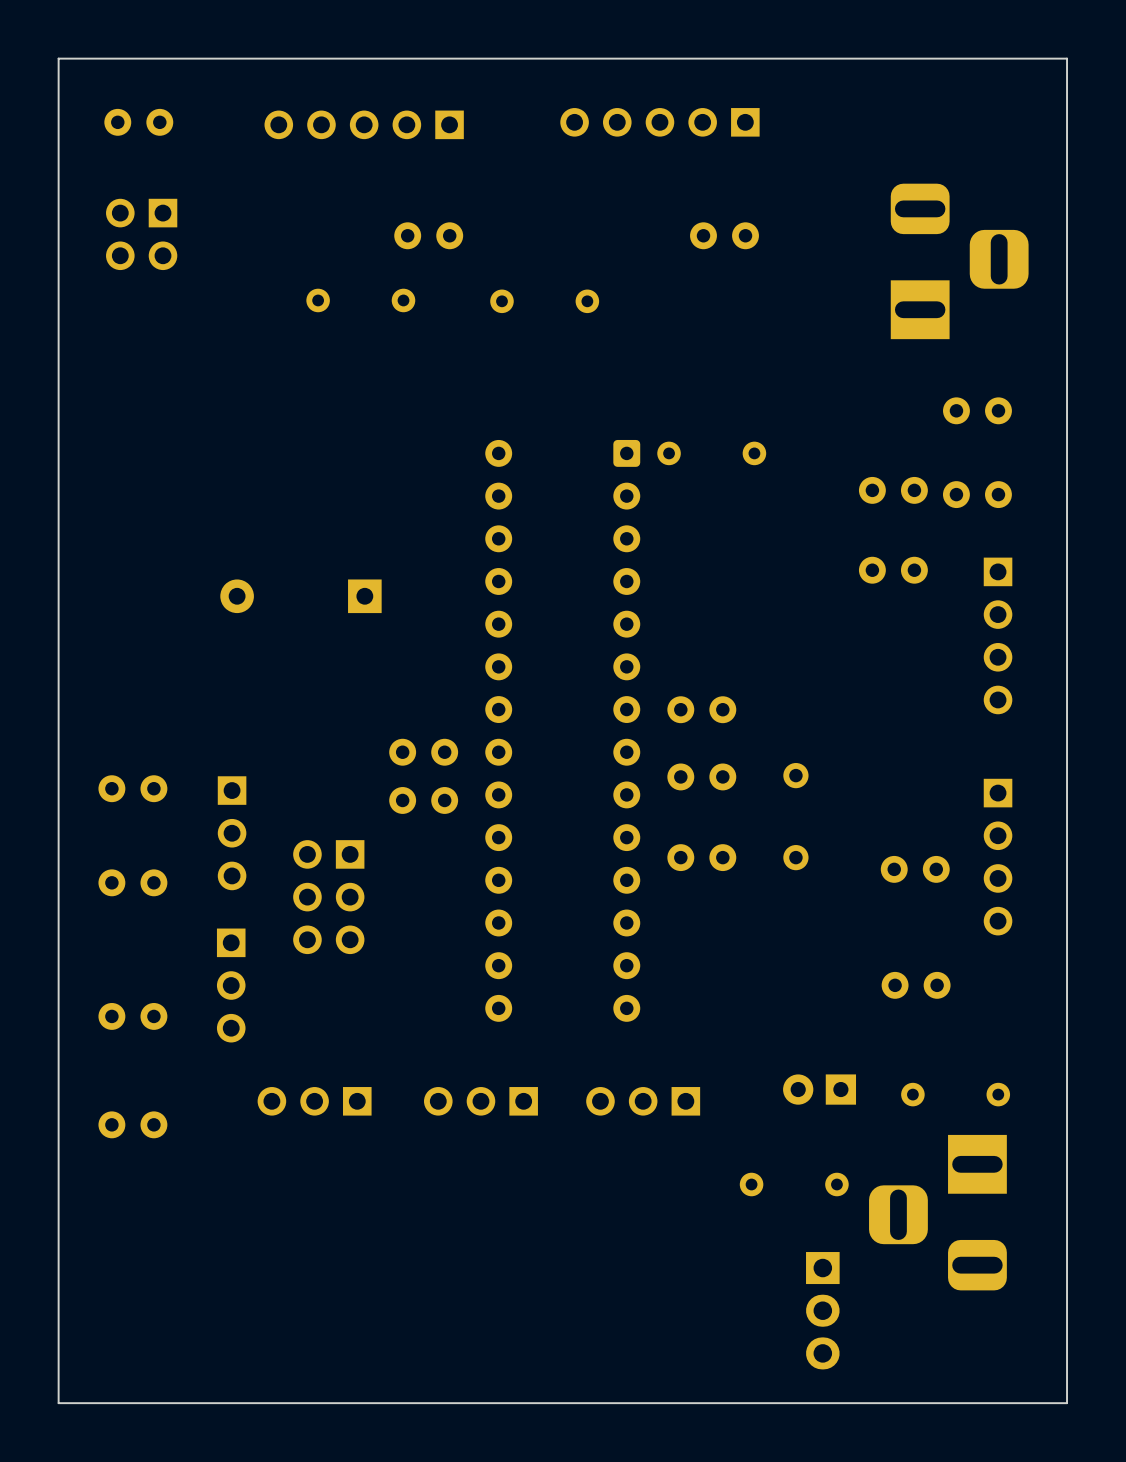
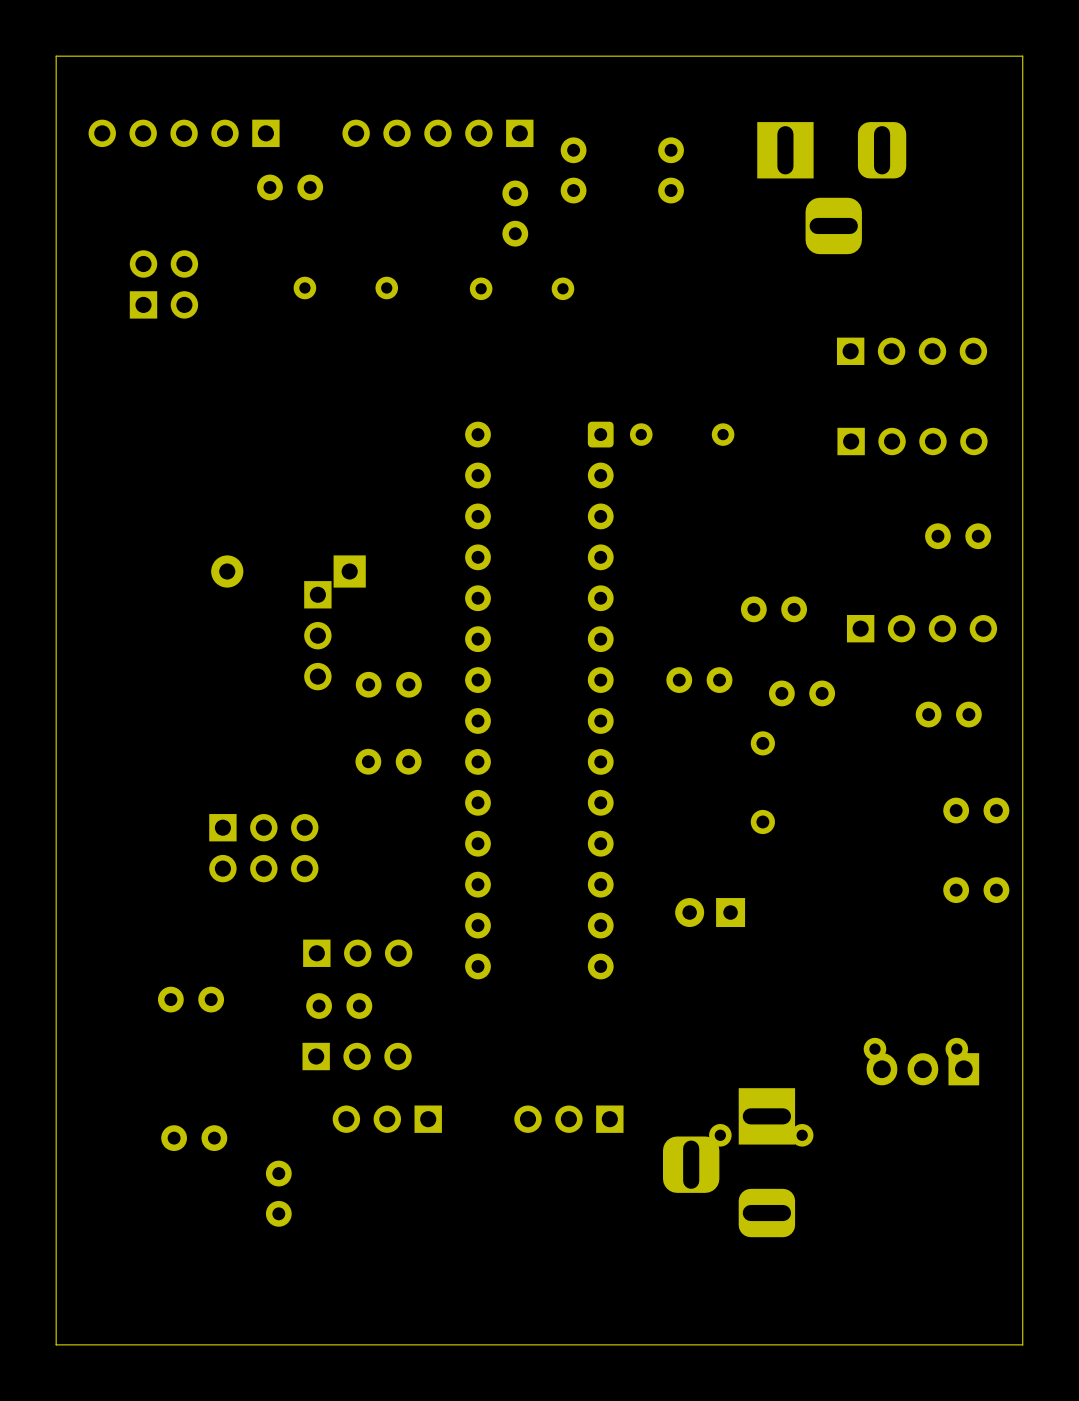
part: (138, 122) -> none
part: (659, 122) -> none
part: (364, 124) -> none
part: none -> (184, 133)
part: none -> (437, 133)
part: none -> (573, 170)
part: none -> (290, 187)
part: none -> (515, 213)
part rotation: 0° (141, 234) -> 180° (163, 284)
part position: (141, 234) -> (163, 284)
part: (428, 235) -> none
part rotation: 0° (724, 235) -> 90° clockwise (671, 170)
part position: (724, 235) -> (671, 170)
part rotation: 0° (959, 261) -> 90° clockwise (831, 188)
part position: (959, 261) -> (831, 188)
part: none -> (912, 351)
part: (977, 410) -> none
part: none -> (912, 441)
part: (893, 490) -> none
part: (977, 494) -> none
part: none -> (958, 536)
part: (893, 570) -> none
part: none -> (773, 609)
part rotation: 0° (998, 635) -> 90° counterclockwise (922, 628)
part: none -> (317, 635)
part position: (701, 709) -> (699, 680)
part: none -> (388, 684)
part: none -> (802, 693)
part: none -> (948, 714)
part: (423, 752) -> none
part: (701, 776) -> none
part: (132, 788) -> none
part position: (423, 800) -> (388, 761)
part: (232, 833) -> none
part: none -> (976, 810)
part: (701, 857) -> none
part: (998, 857) -> none
part: (915, 869) -> none
part: (132, 882) -> none
part rotation: 0° (328, 897) -> 90° counterclockwise (263, 848)
part: none -> (976, 890)
part: (231, 985) -> none
part: (916, 985) -> none
part: none -> (357, 953)
part: (132, 1016) -> none
part: none -> (191, 999)
part: none -> (339, 1006)
part position: (819, 1089) -> (710, 912)
part: (314, 1101) -> none
part: (480, 1101) -> none
part: (643, 1101) -> none
part: none -> (357, 1056)
part: (132, 1124) -> none
part: none -> (387, 1119)
part: none -> (568, 1119)
part: none -> (194, 1138)
part position: (937, 1212) -> (729, 1162)
part: none -> (278, 1193)
part rotation: 0° (822, 1310) -> 90° clockwise (922, 1069)
part position: (822, 1310) -> (922, 1069)

